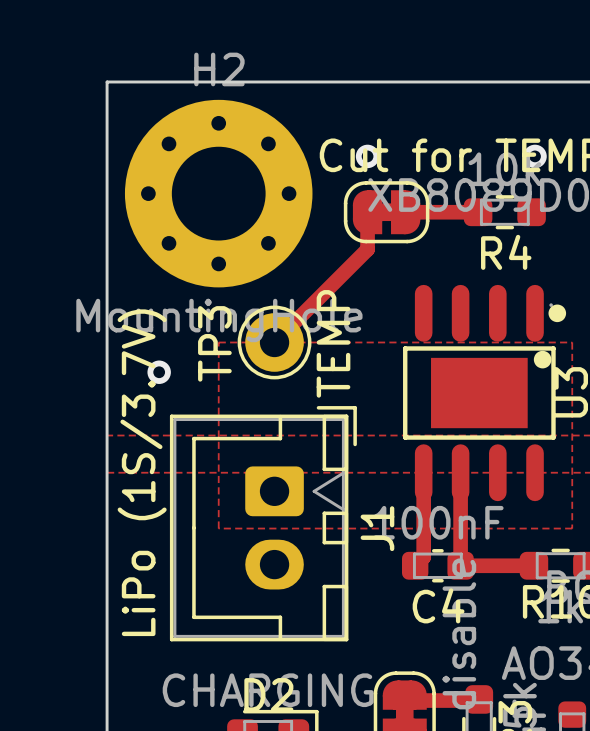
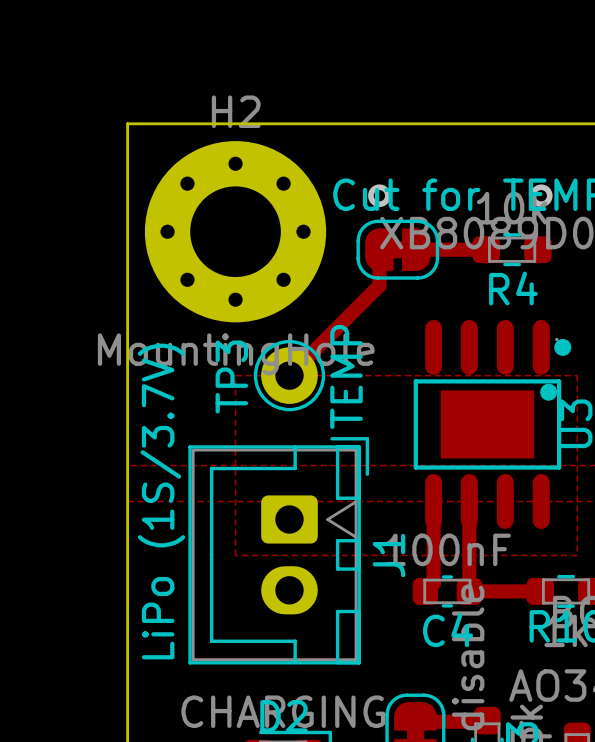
via: (159, 372) -> none

